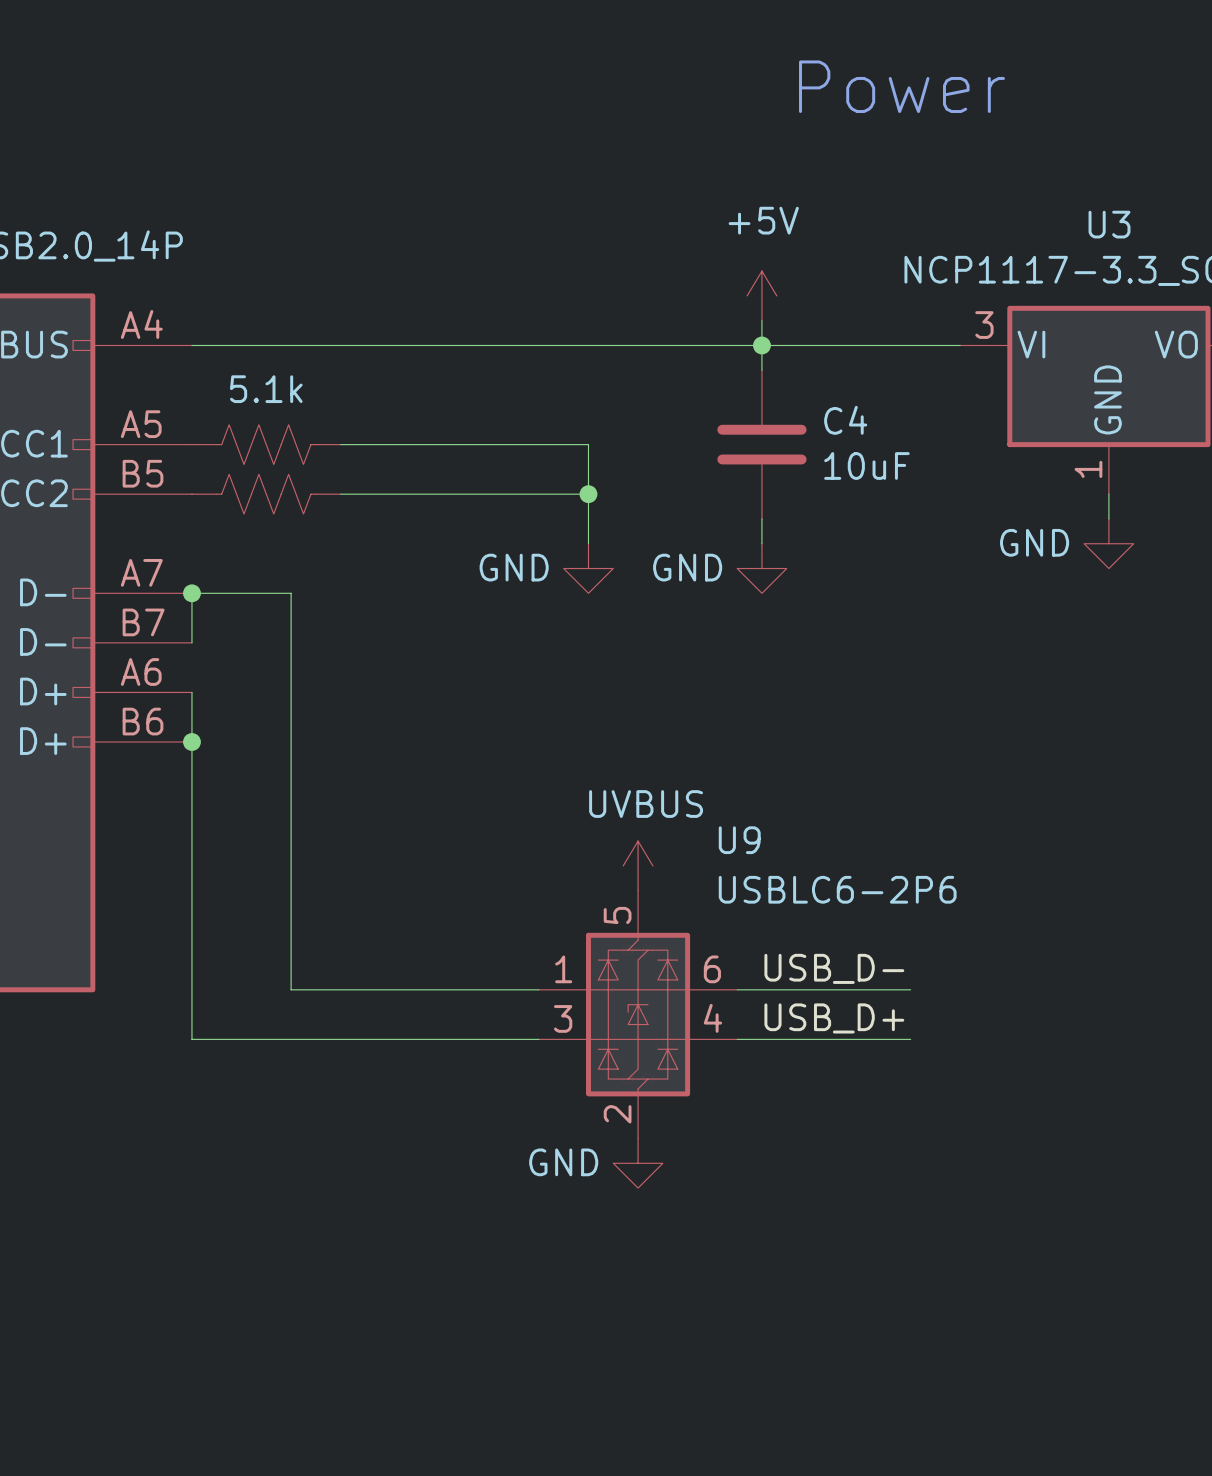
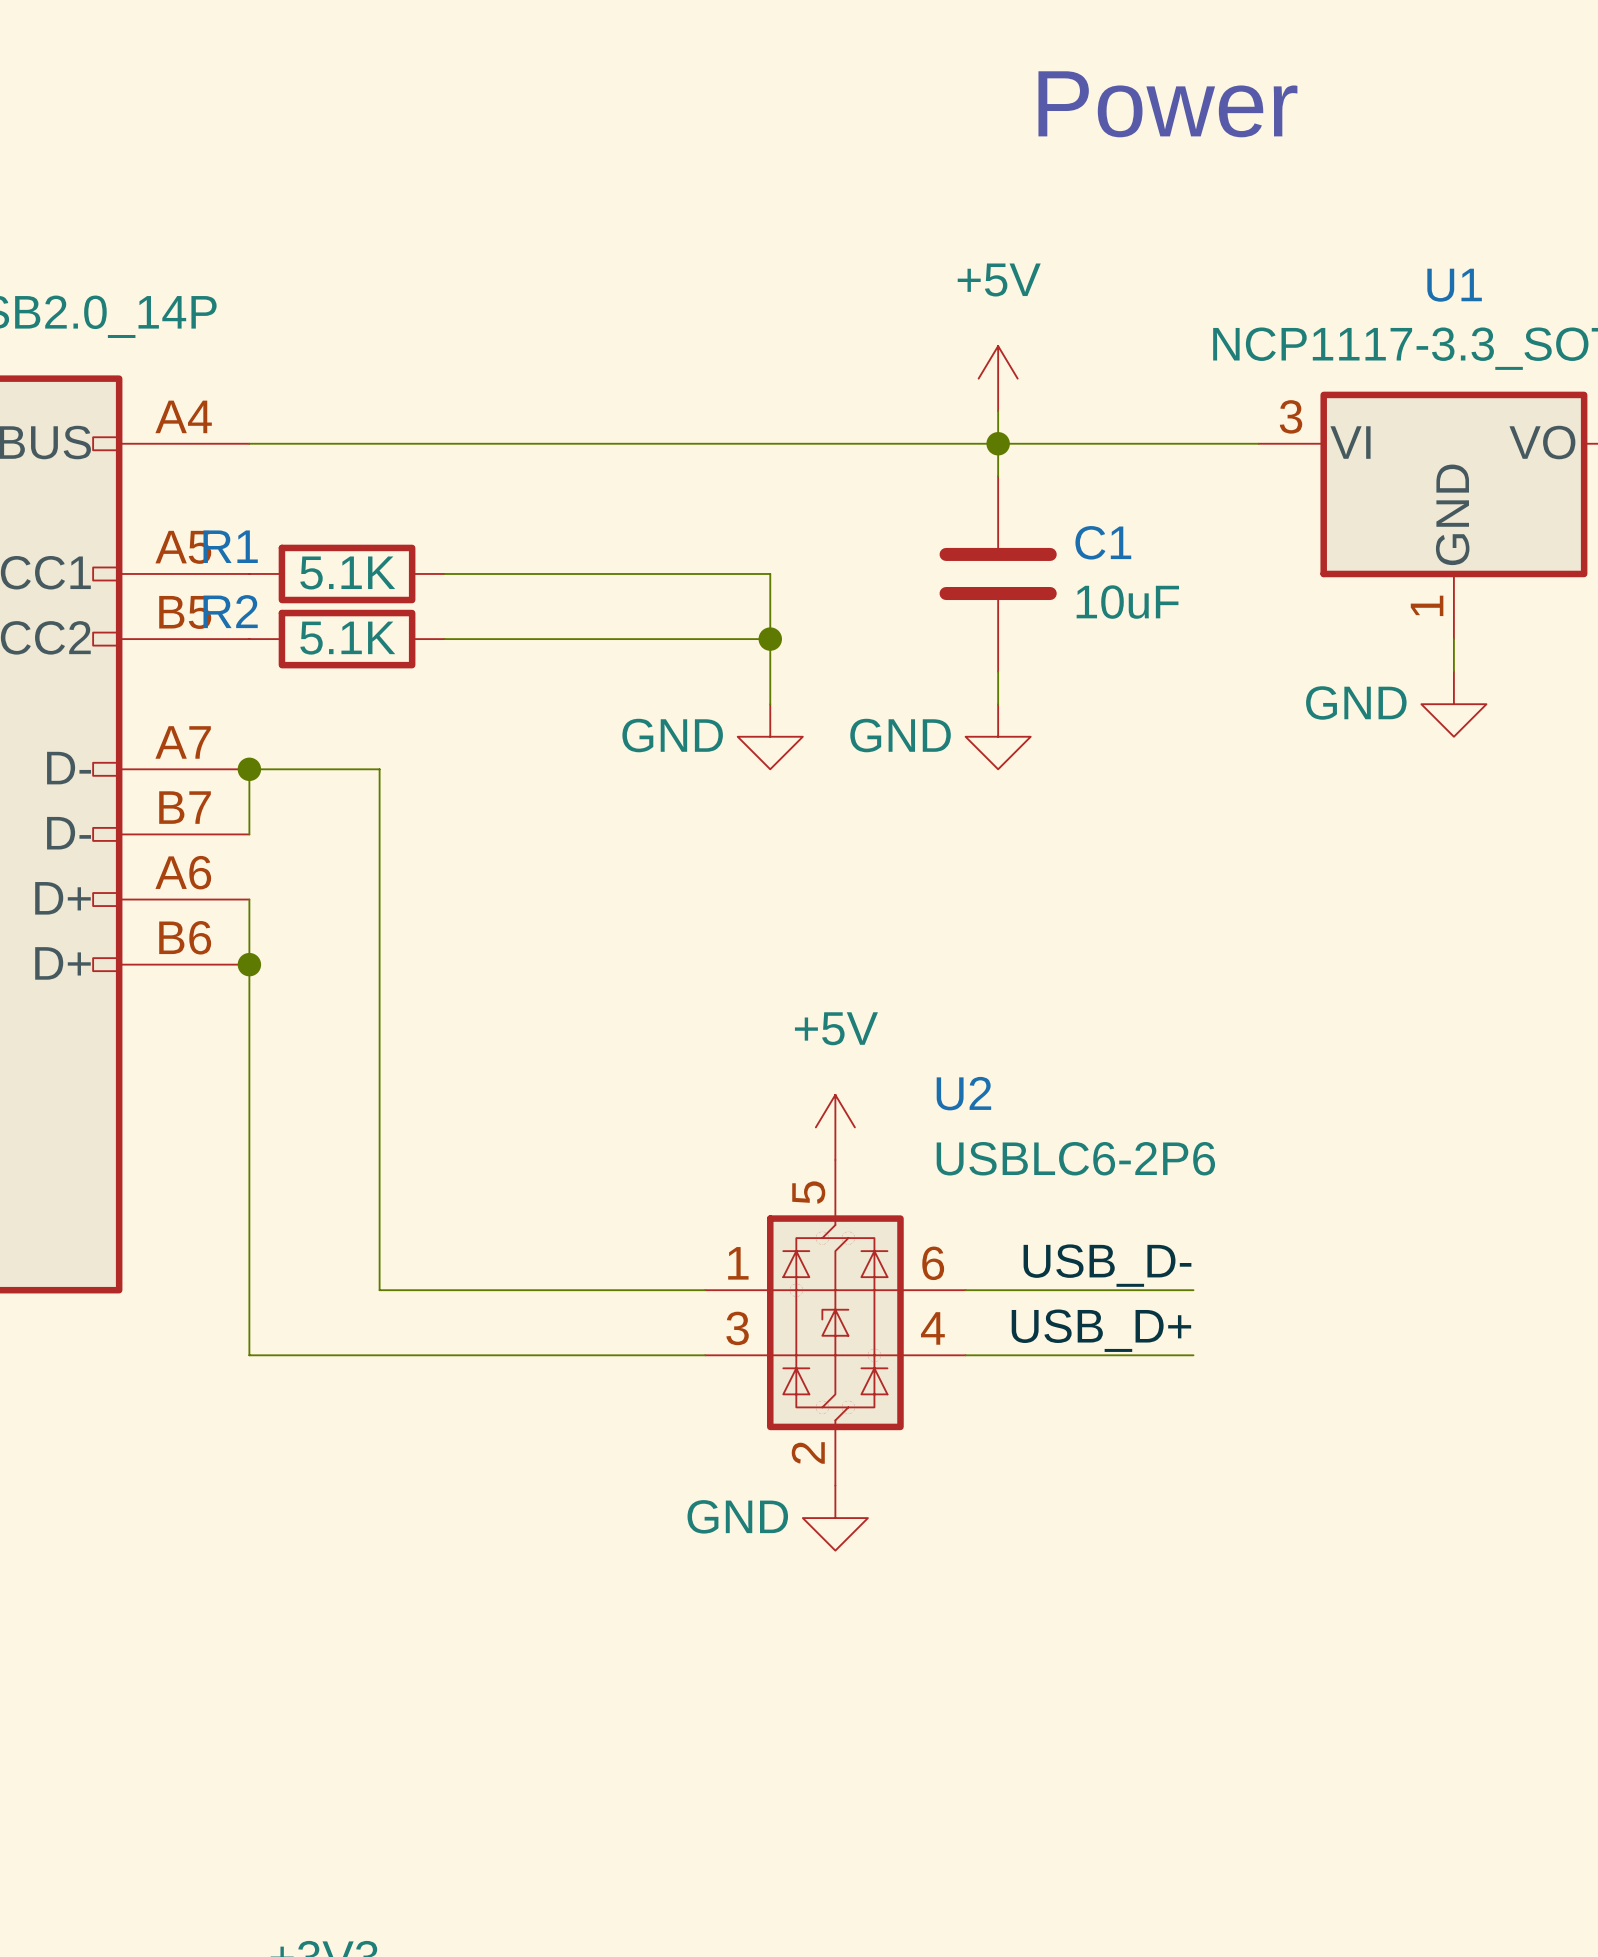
U3 name: U3 (1109, 224) -> U1 (1454, 285)
C4 name: C4 (845, 420) -> C1 (1103, 542)
part: 5.1k (266, 444) -> none
R1: none -> 5.1K (347, 573)
part: (266, 494) -> none
R2: none -> 5.1K (347, 639)
U9 name: U9 (739, 840) -> U2 (963, 1093)
power symbol: UVBUS (638, 865) -> +5V (835, 1127)

